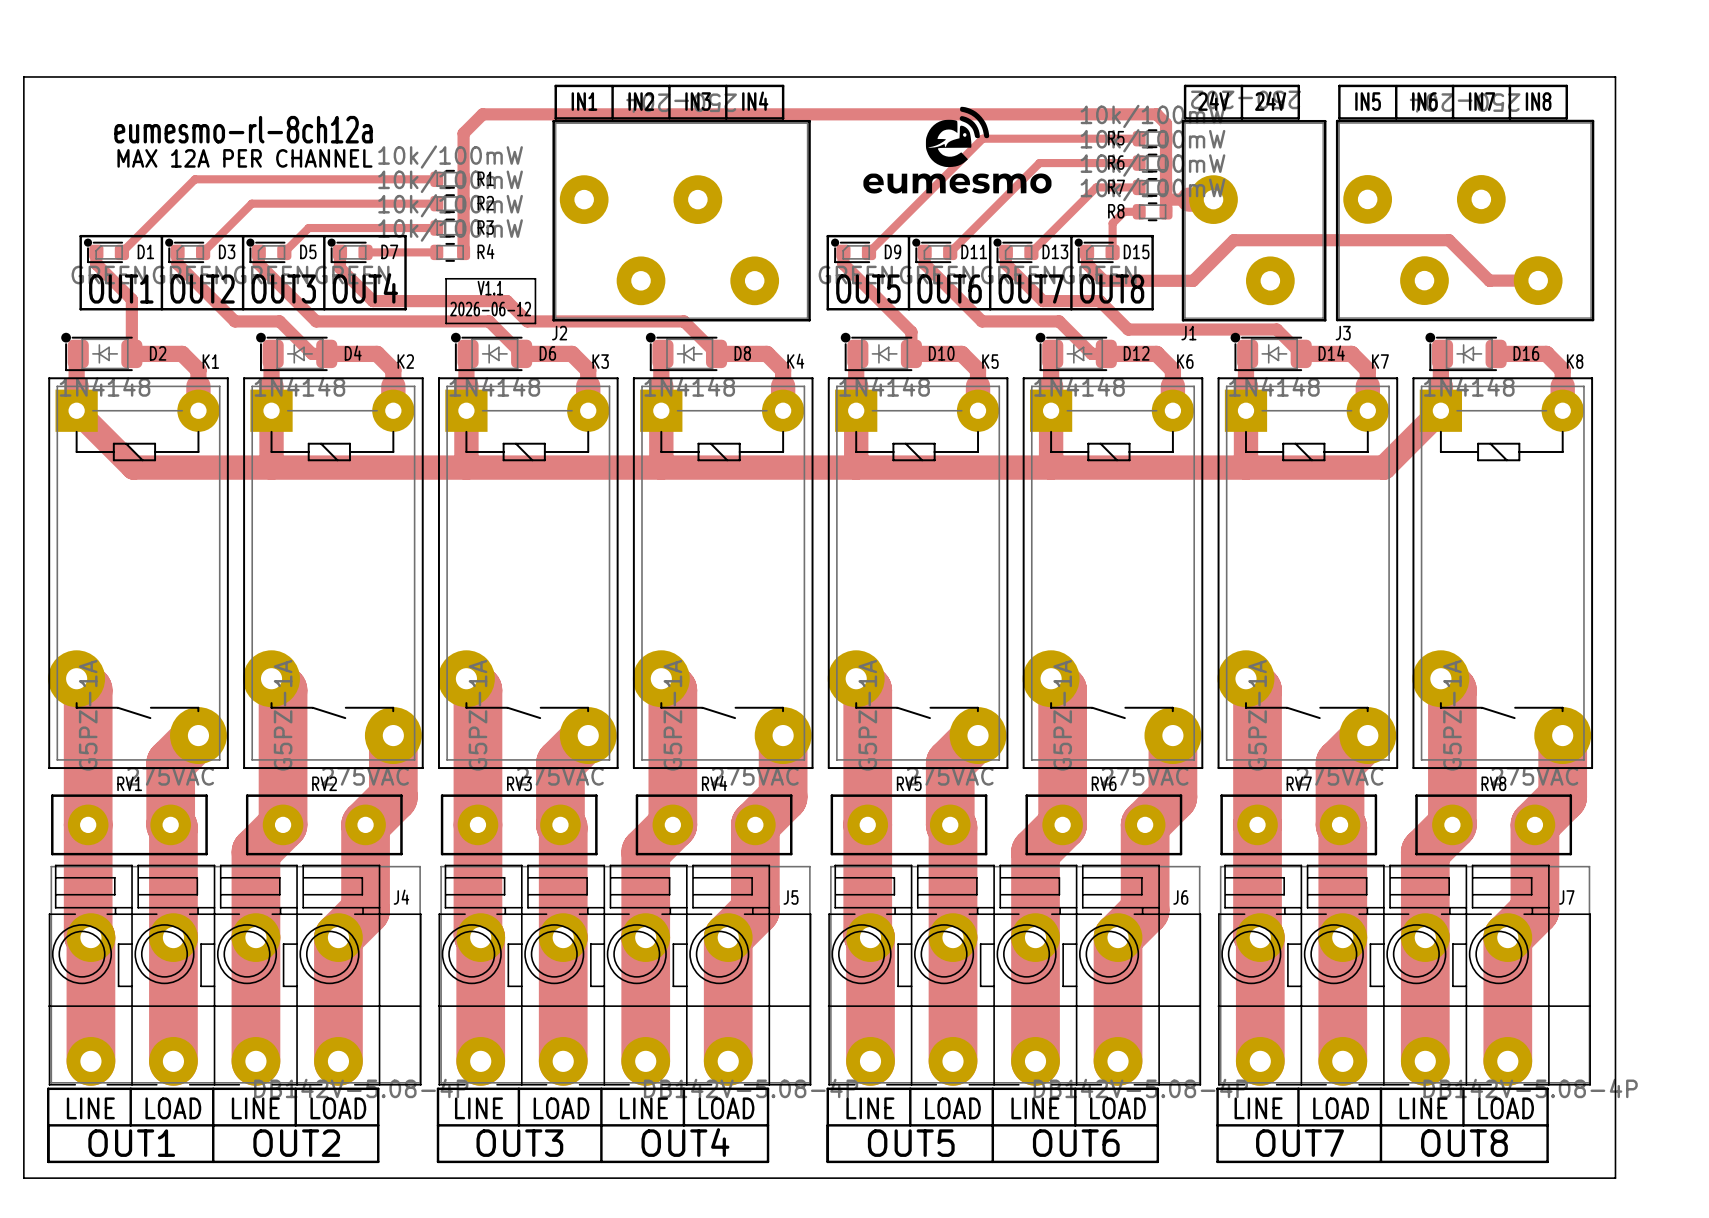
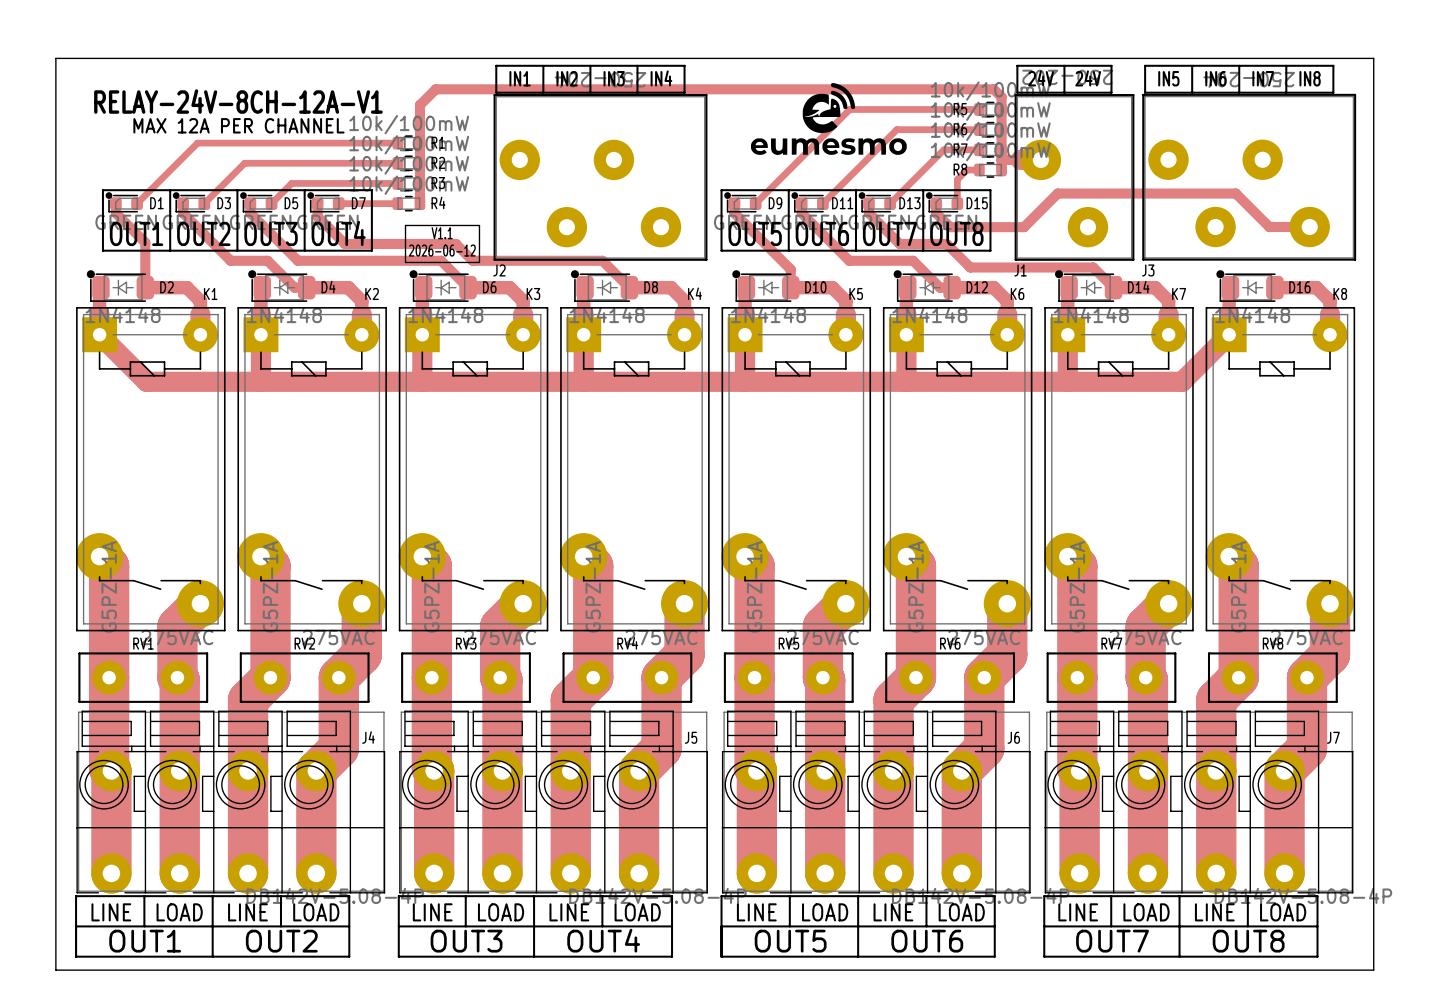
text: eumesmo-rl-8ch12a (243, 129) -> RELAY-24V-8CH-12A-V1 (238, 101)

